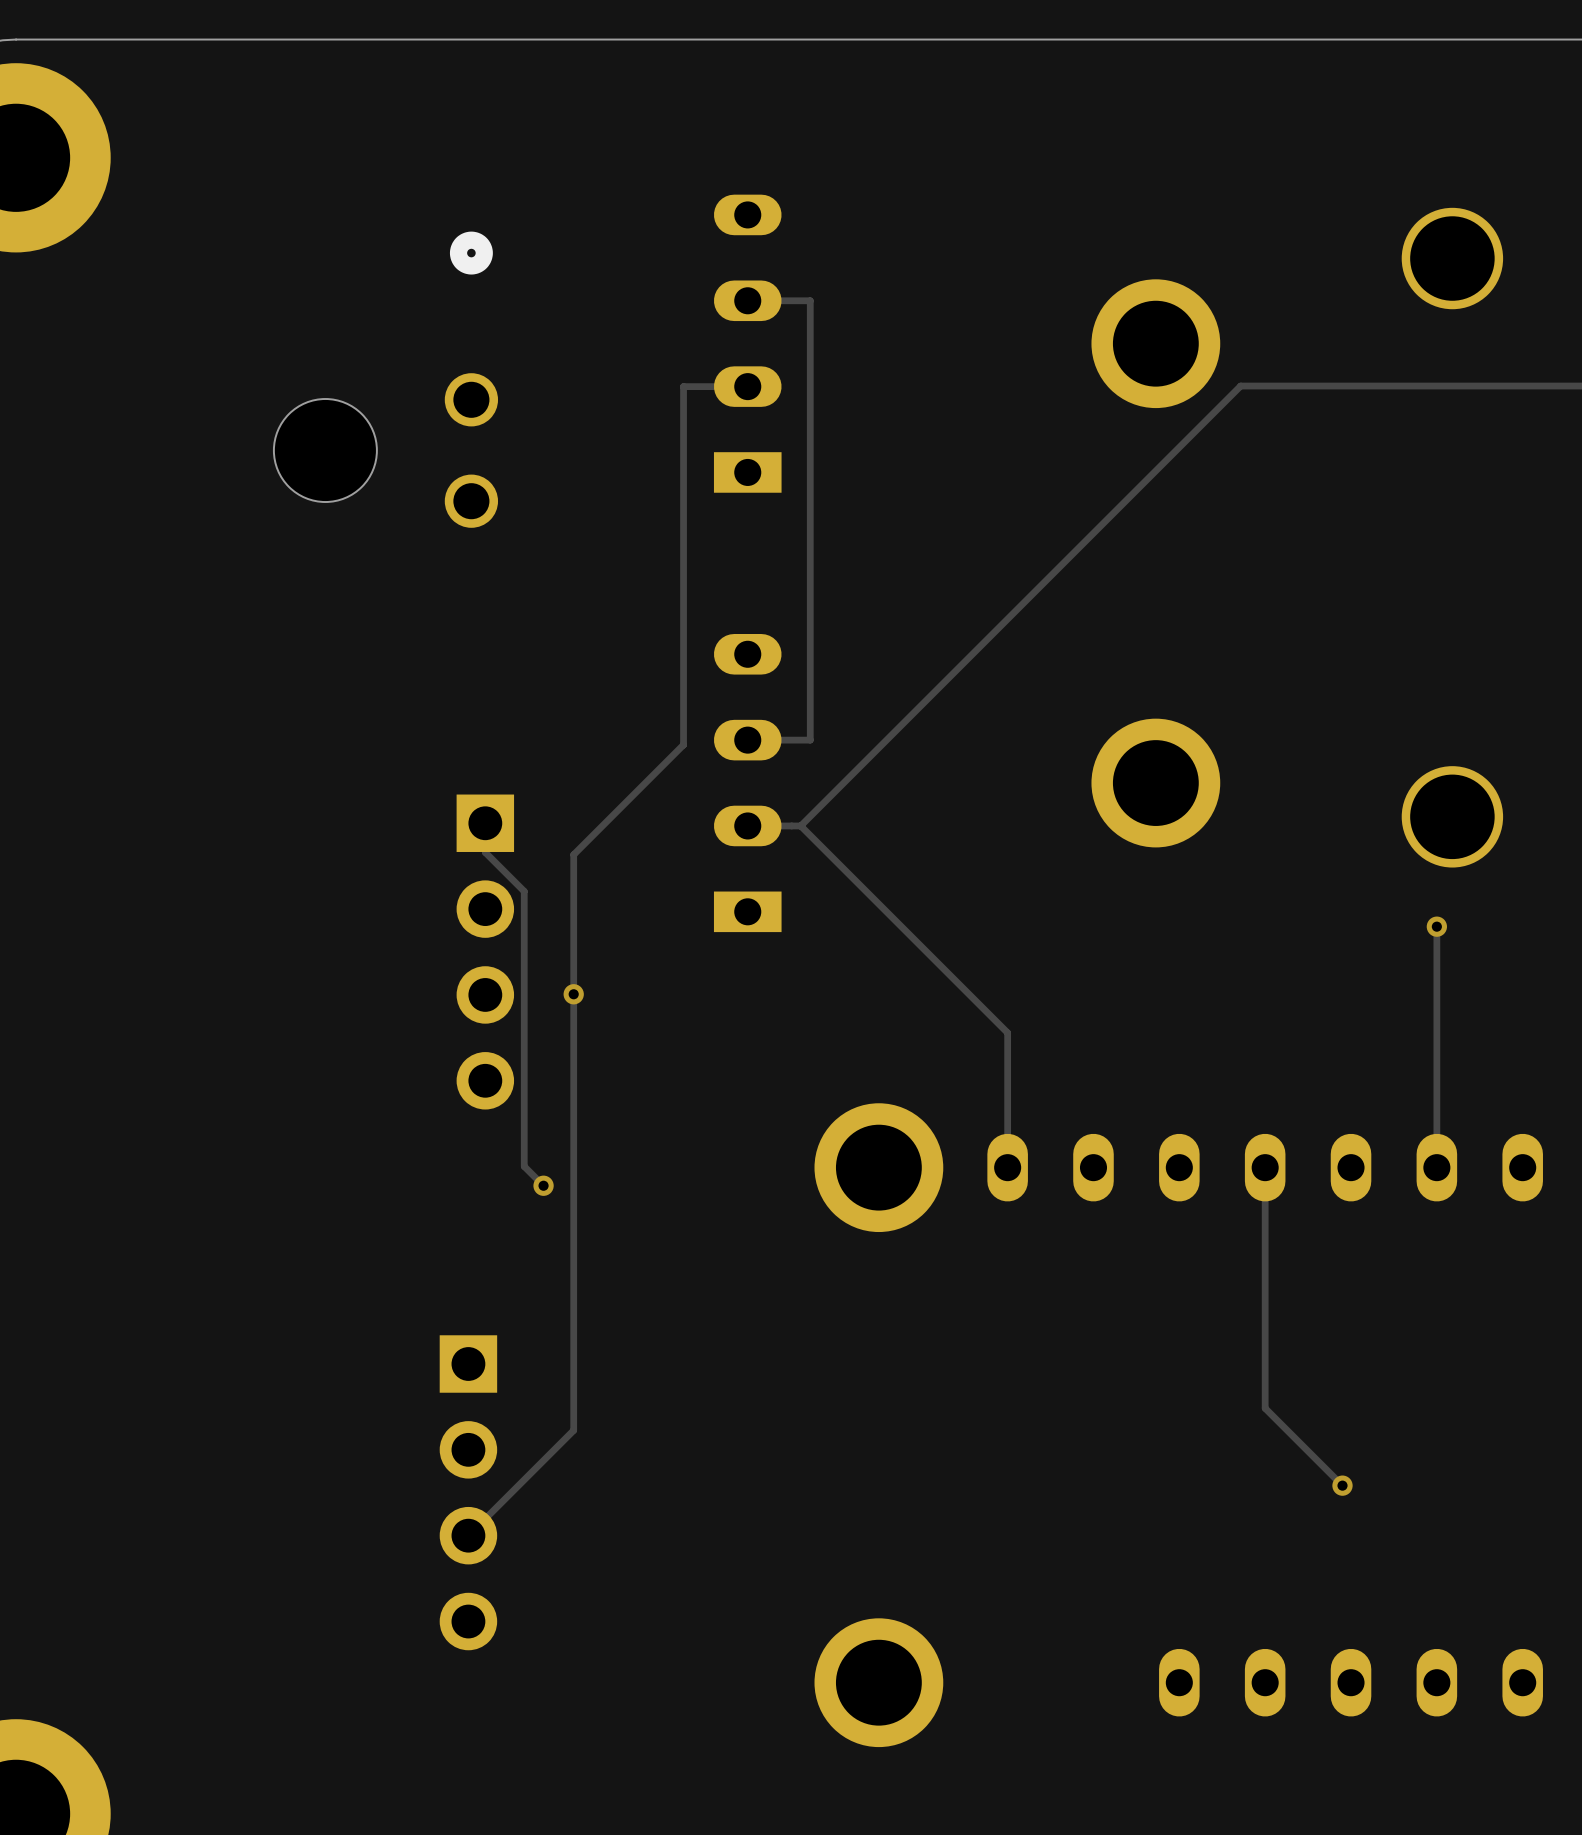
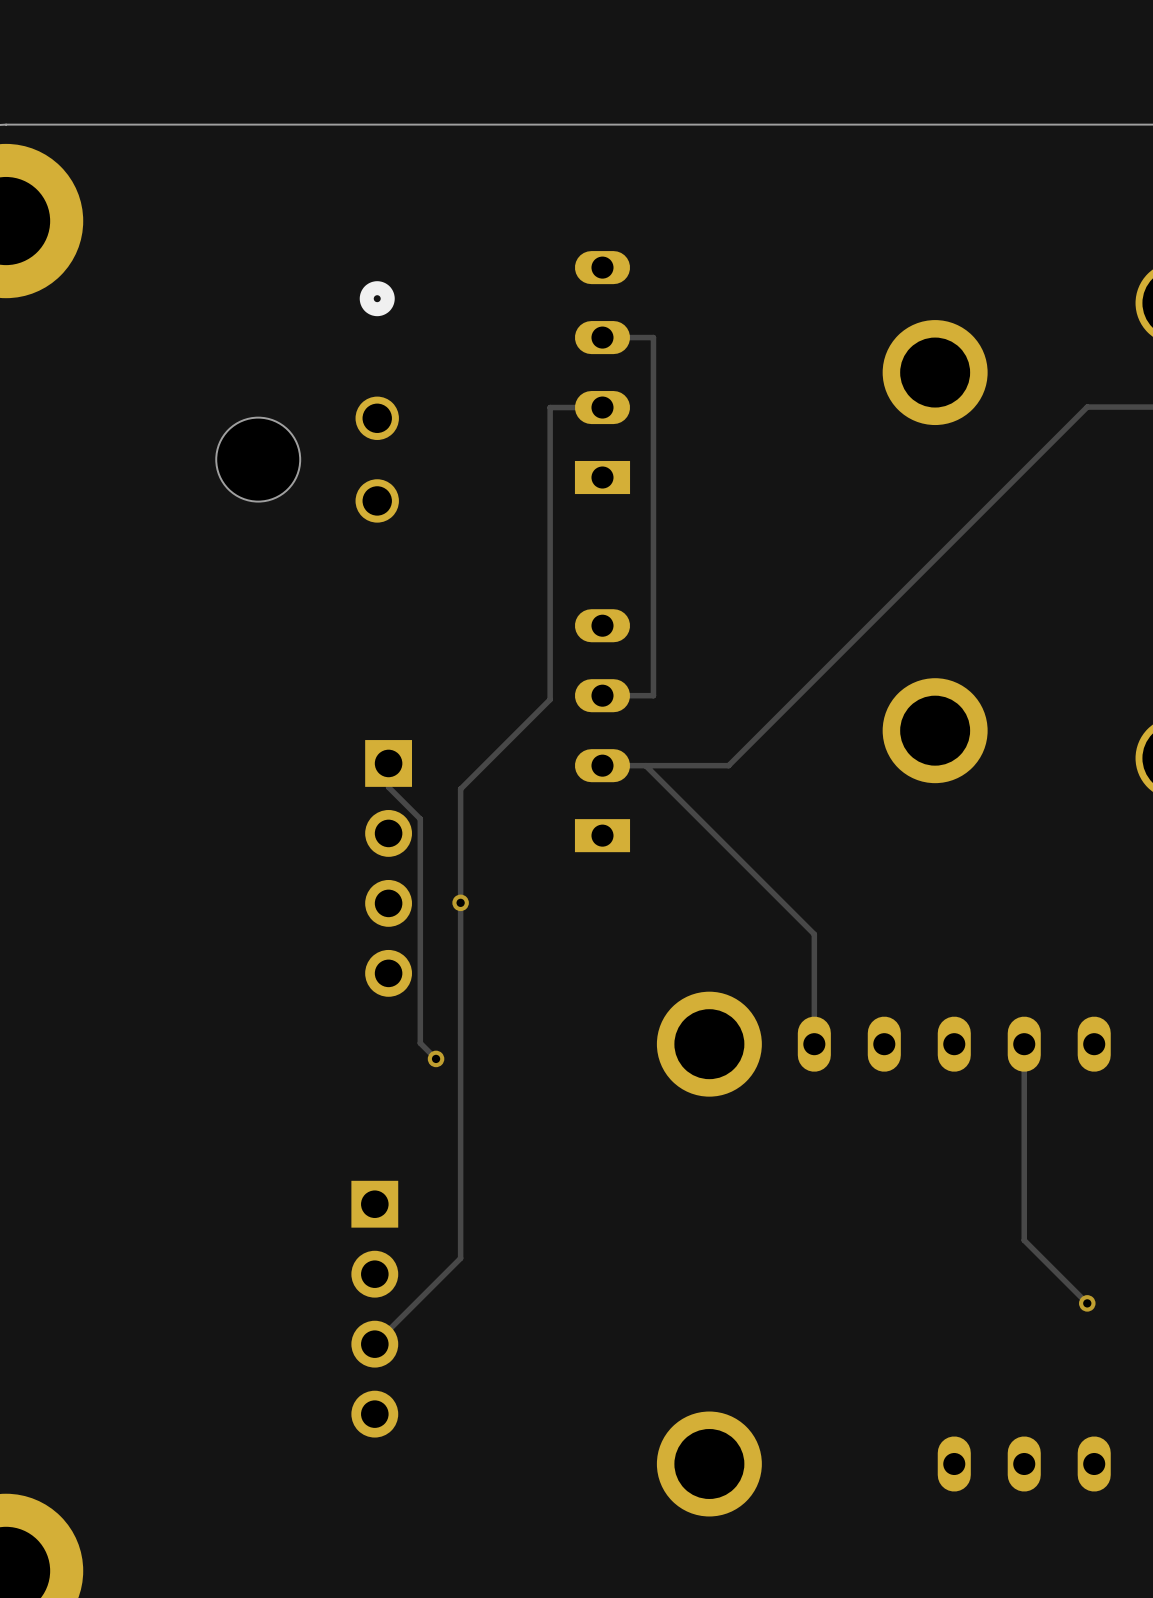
track: (1342, 386) (1240, 386) (800, 825) (1007, 1032) -> (1087, 407) (728, 765) (645, 765) (814, 934)

